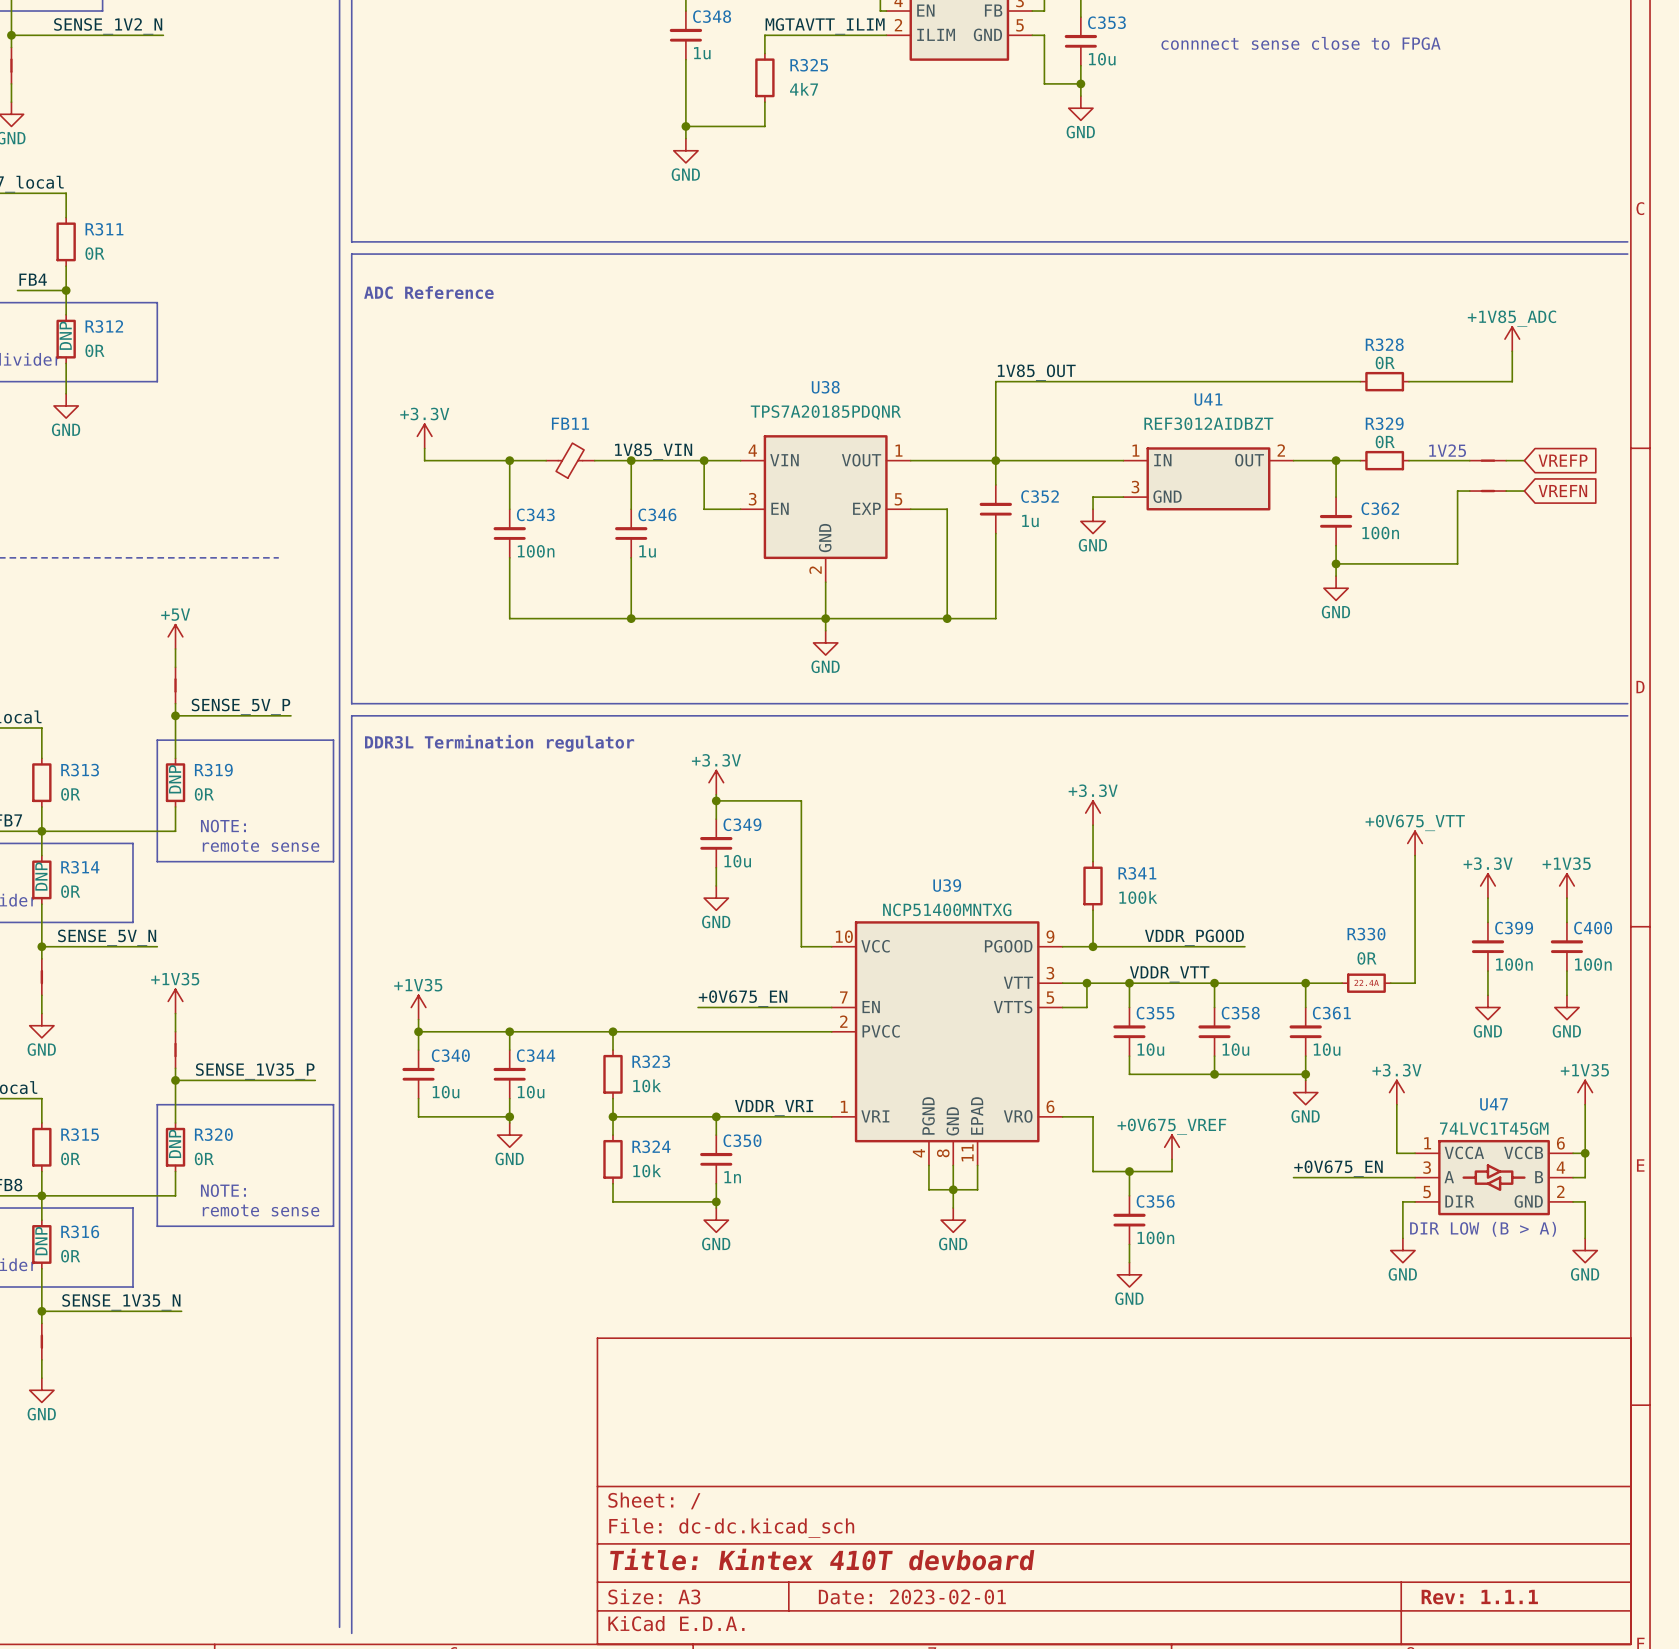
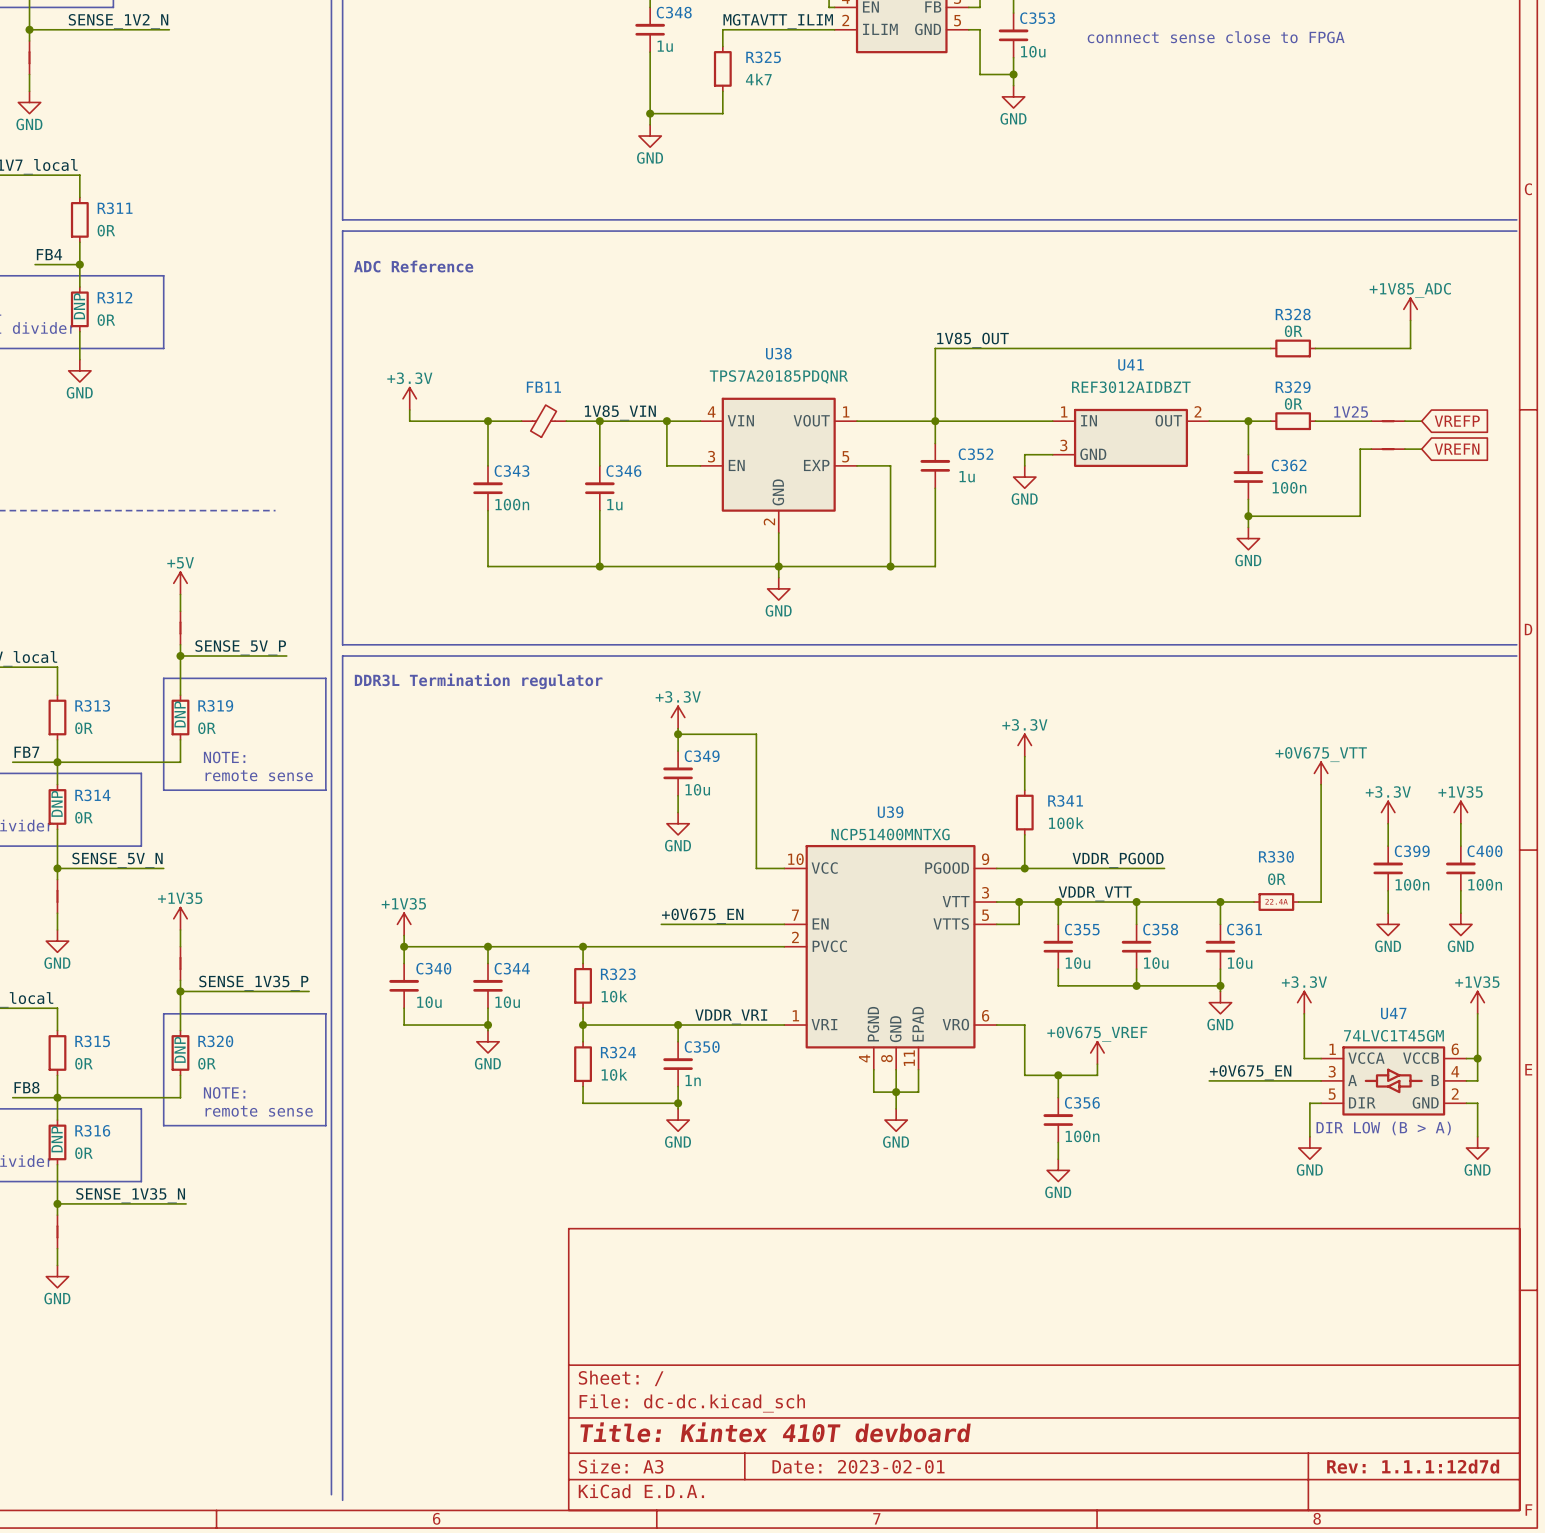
title block: Rev: 1.1.1 (1479, 1597) -> Rev: 1.1.1:12d7d (1413, 1466)

